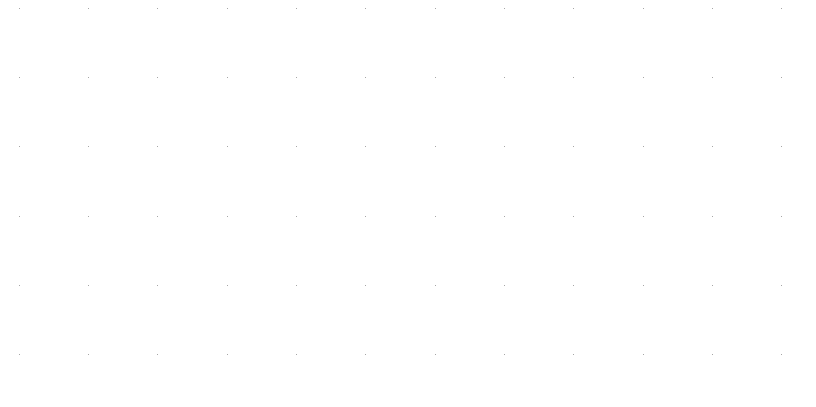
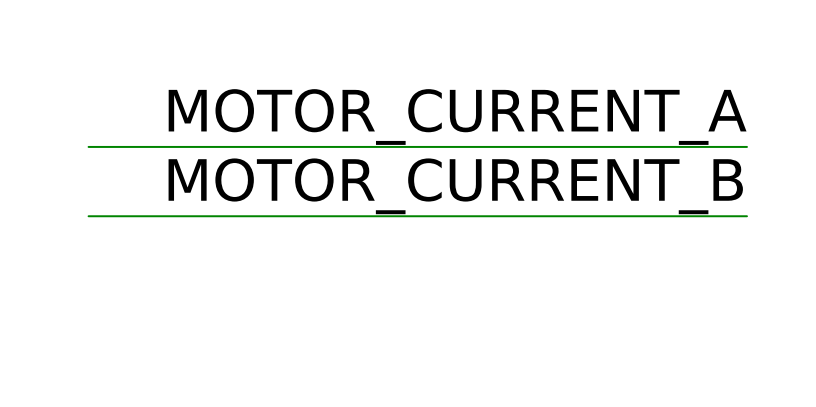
label: none -> MOTOR_CURRENT_A (457, 117)
wire: none -> (88, 146) (746, 146)
label: none -> MOTOR_CURRENT_B (455, 186)
wire: none -> (88, 216) (746, 216)

